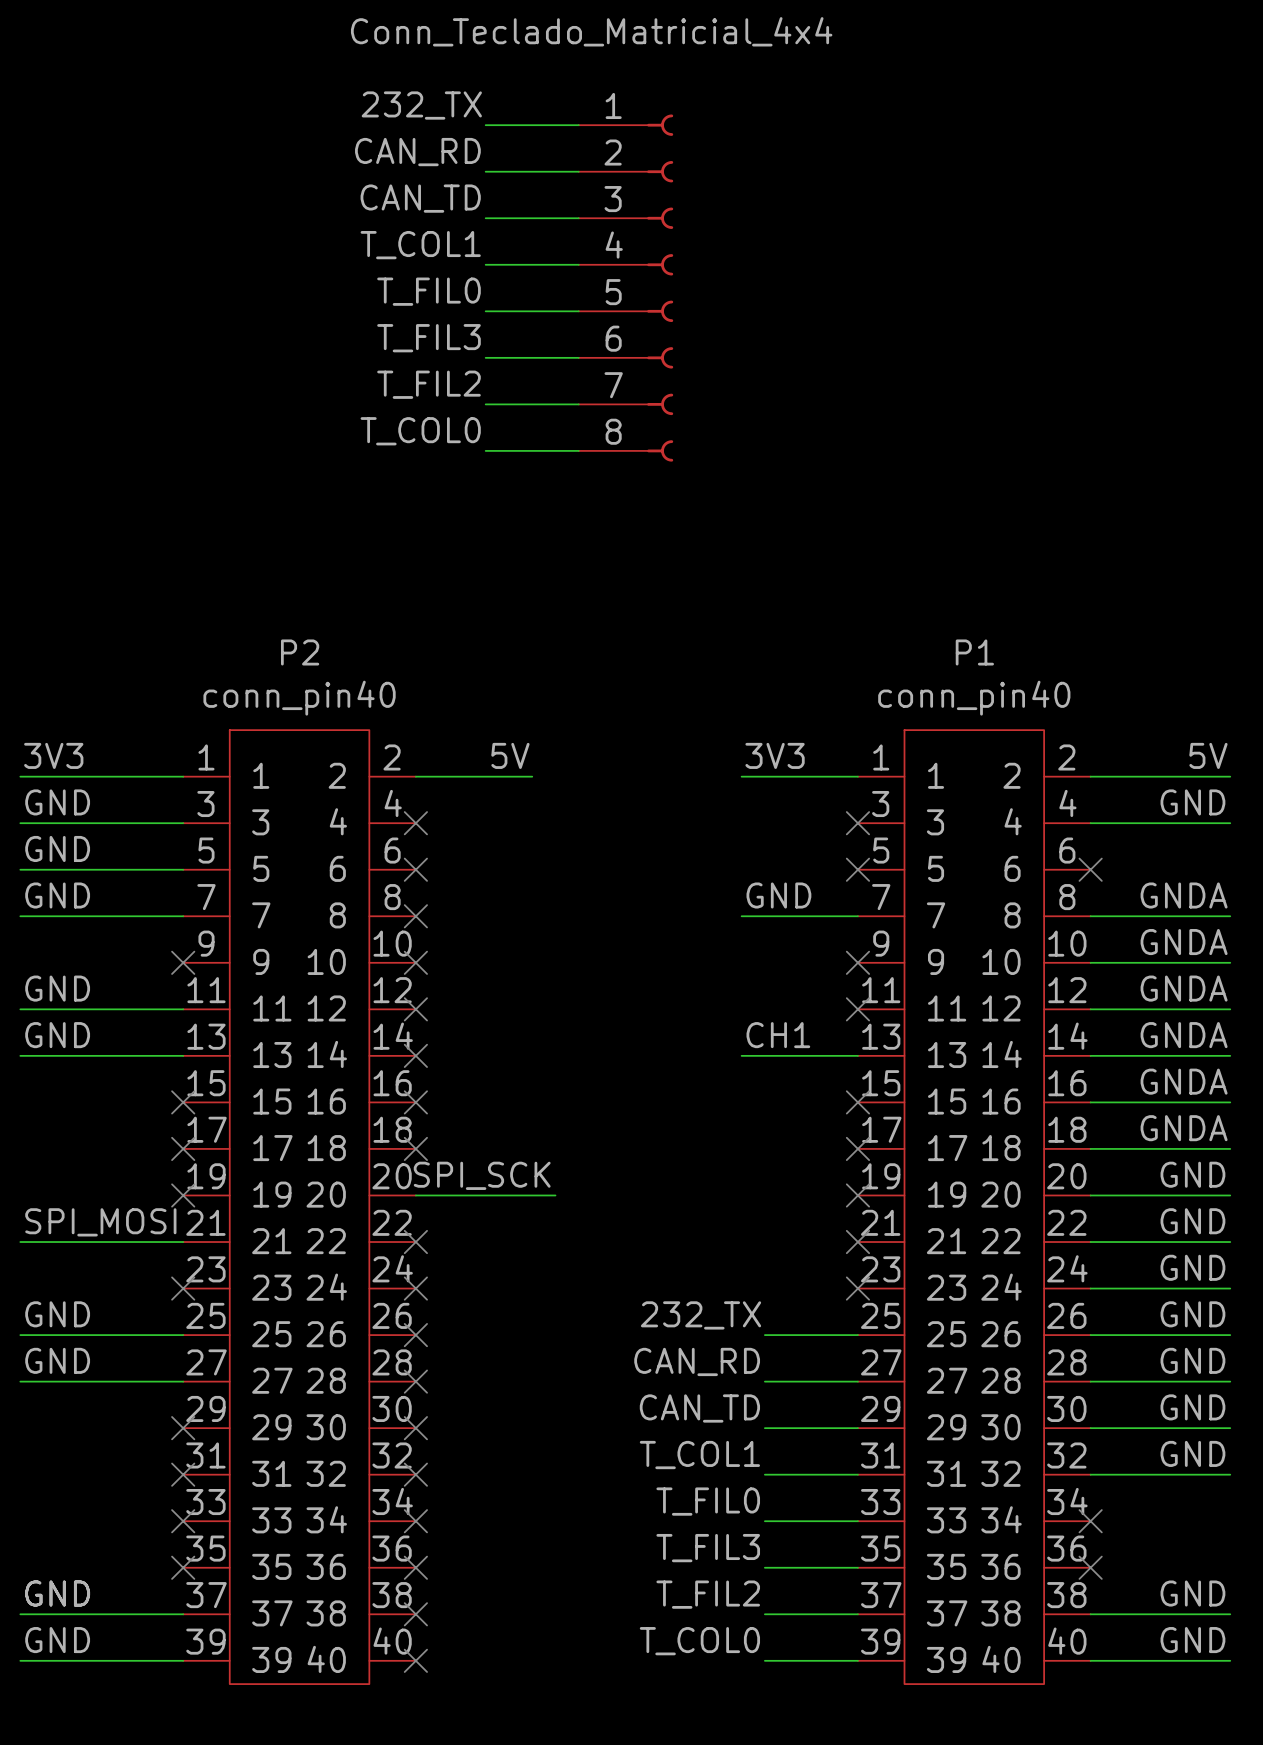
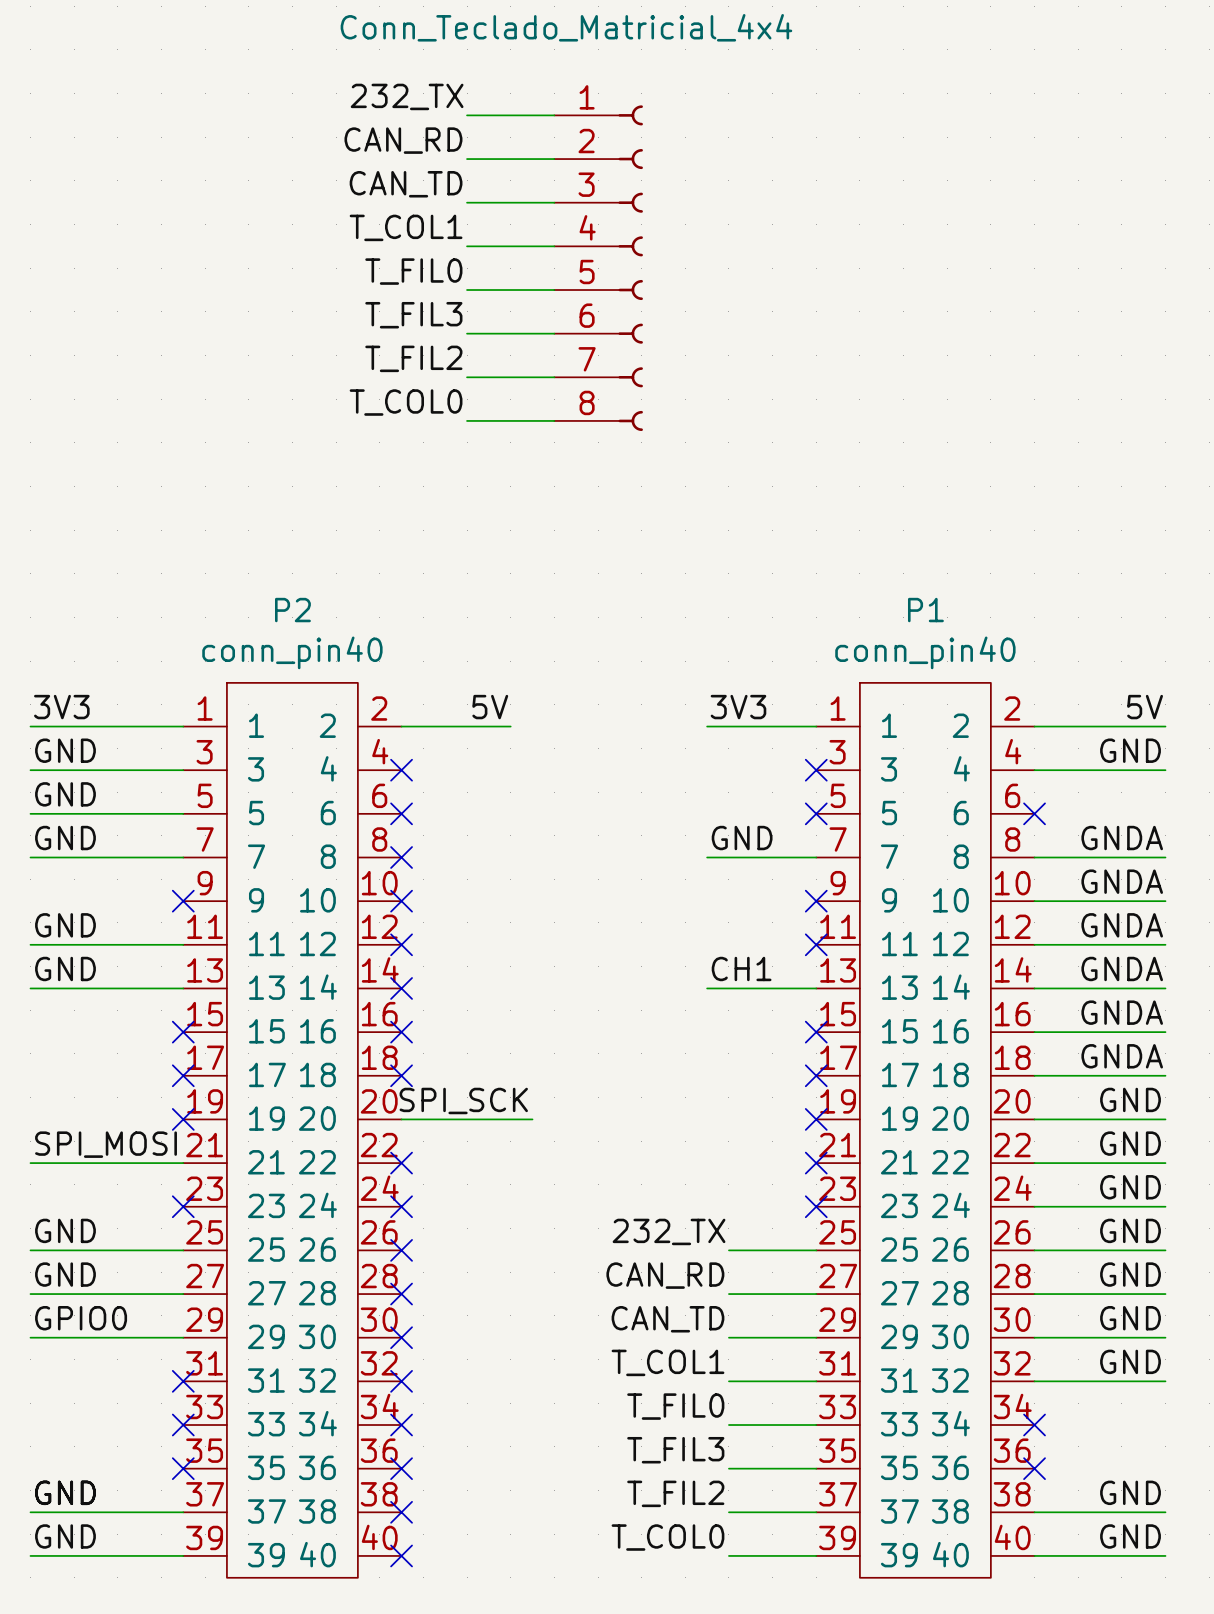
label: none -> GPIO0 (81, 1318)
wire: none -> (30, 1337) (183, 1337)
no-connect mark: (183, 1428) -> none

